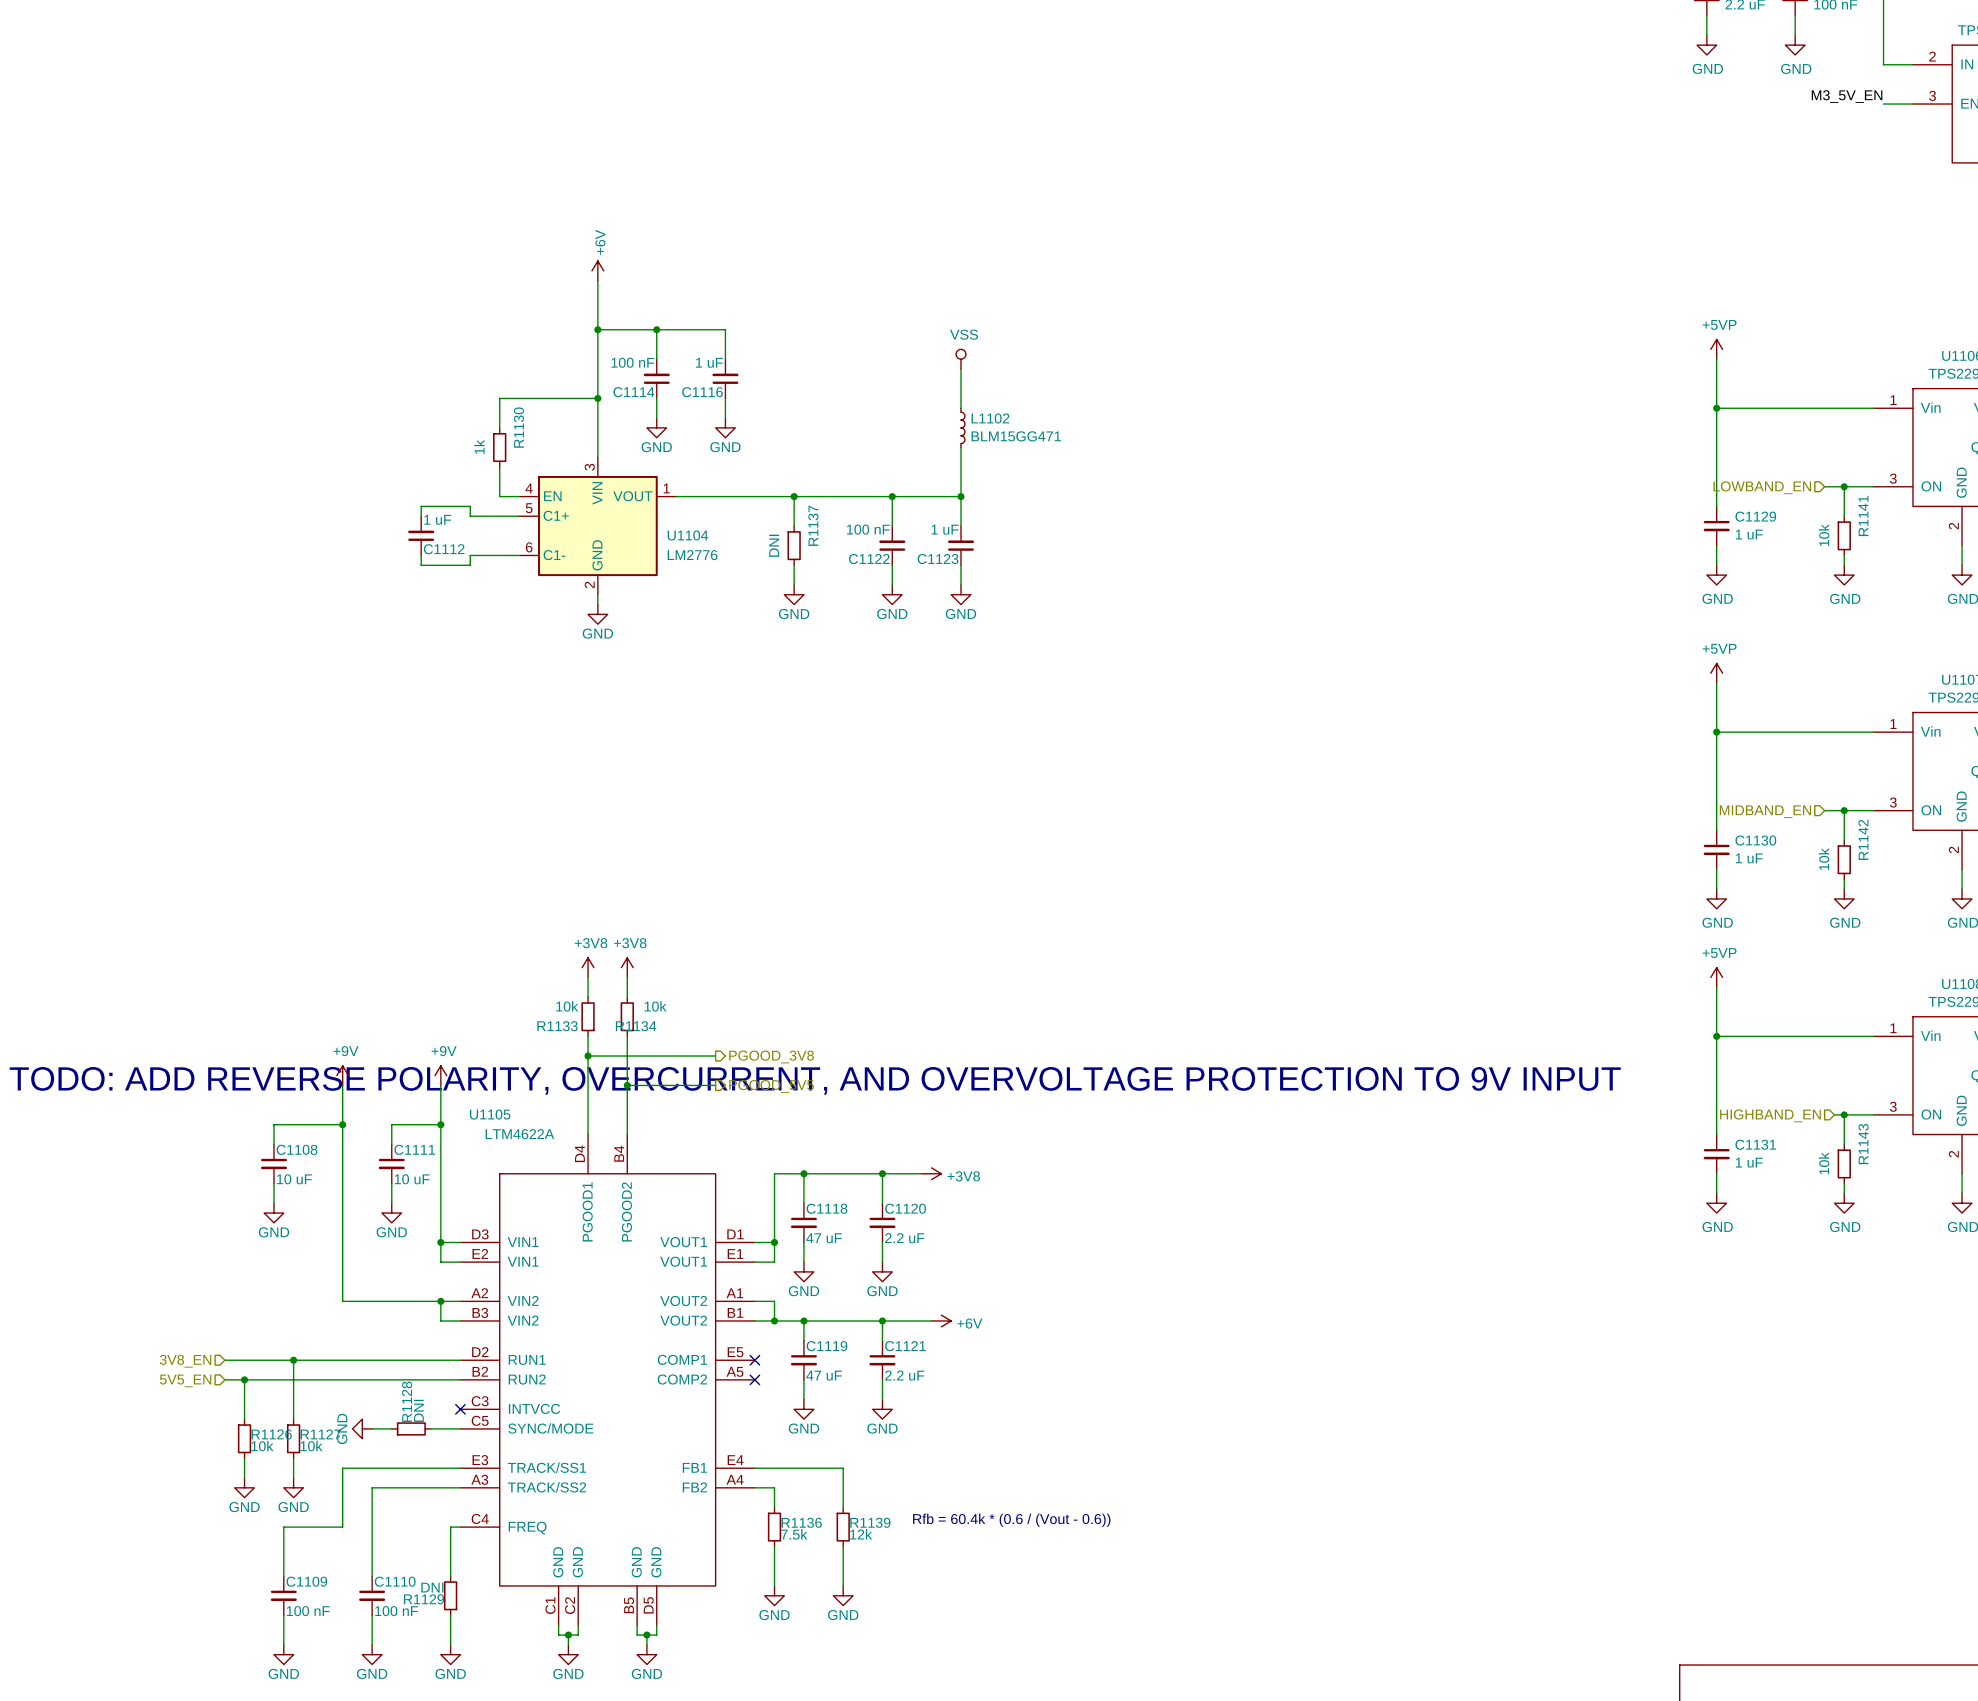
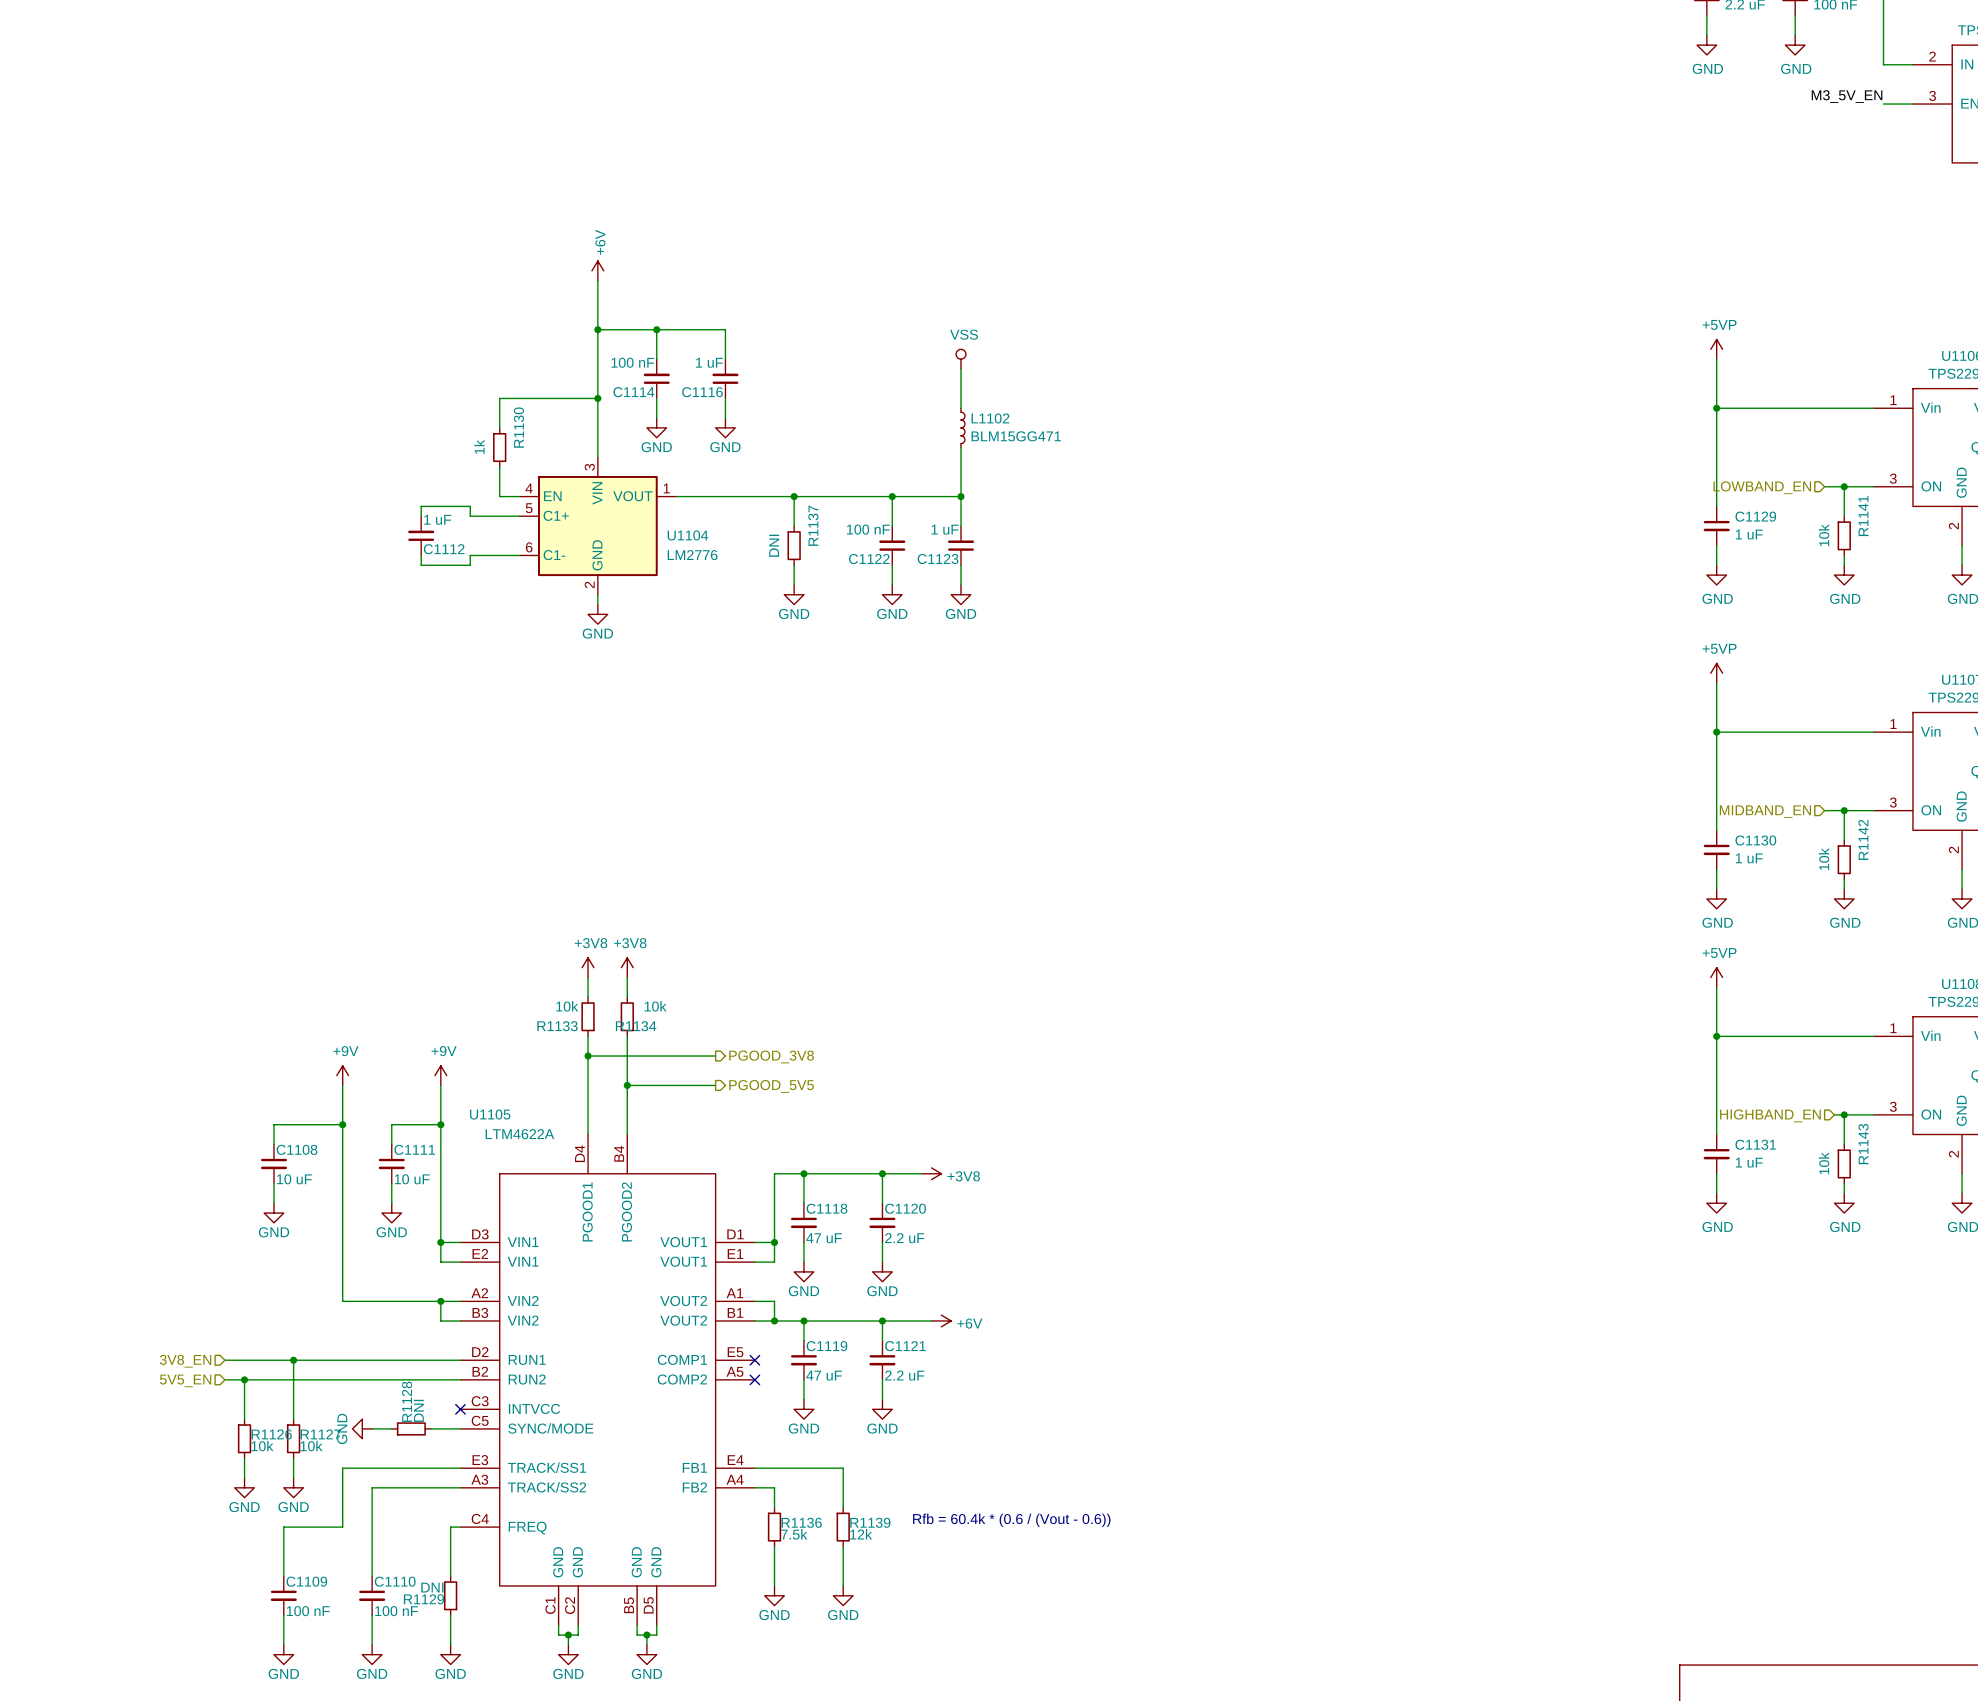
text: TODO: ADD REVERSE POLARITY, OVERCURRENT, AND OVERVOLTAGE PROTECTION TO 9V INPUT (815, 1080) -> none

